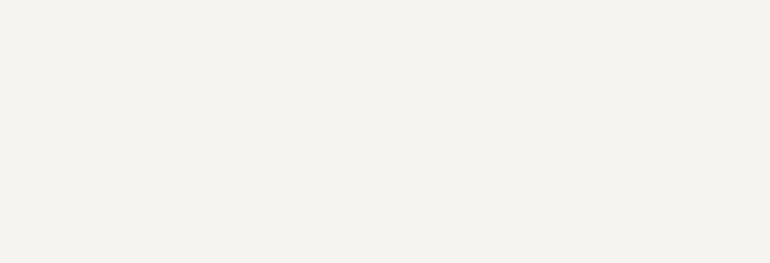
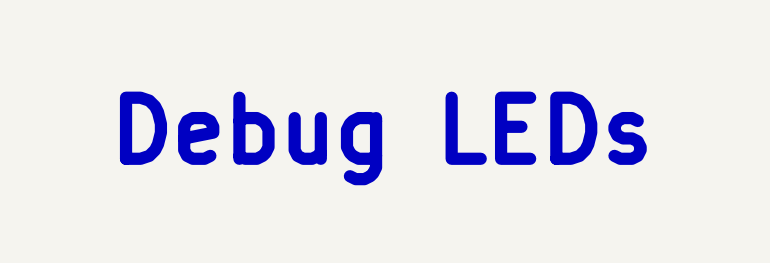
text: none -> Debug LEDs (383, 138)

